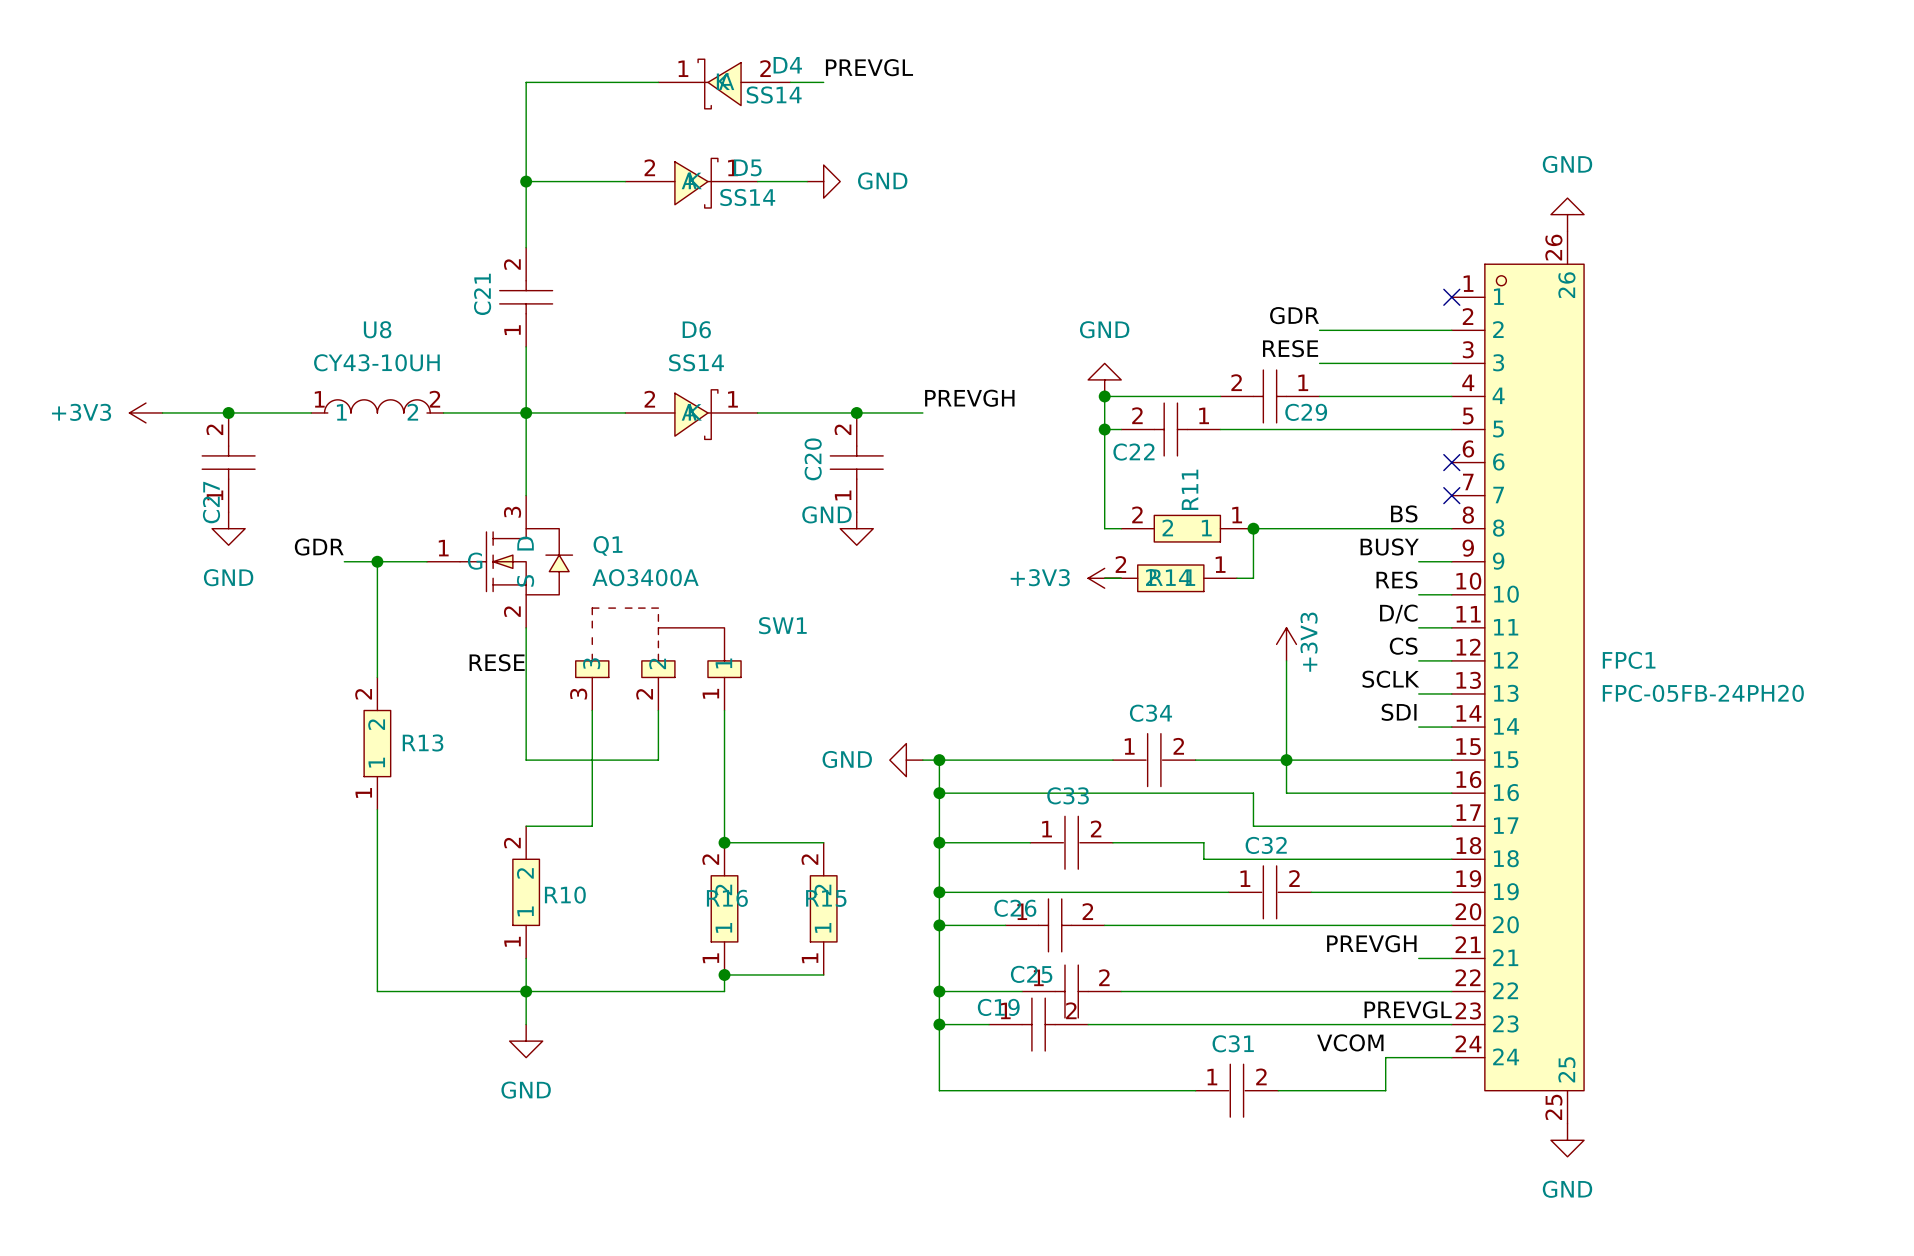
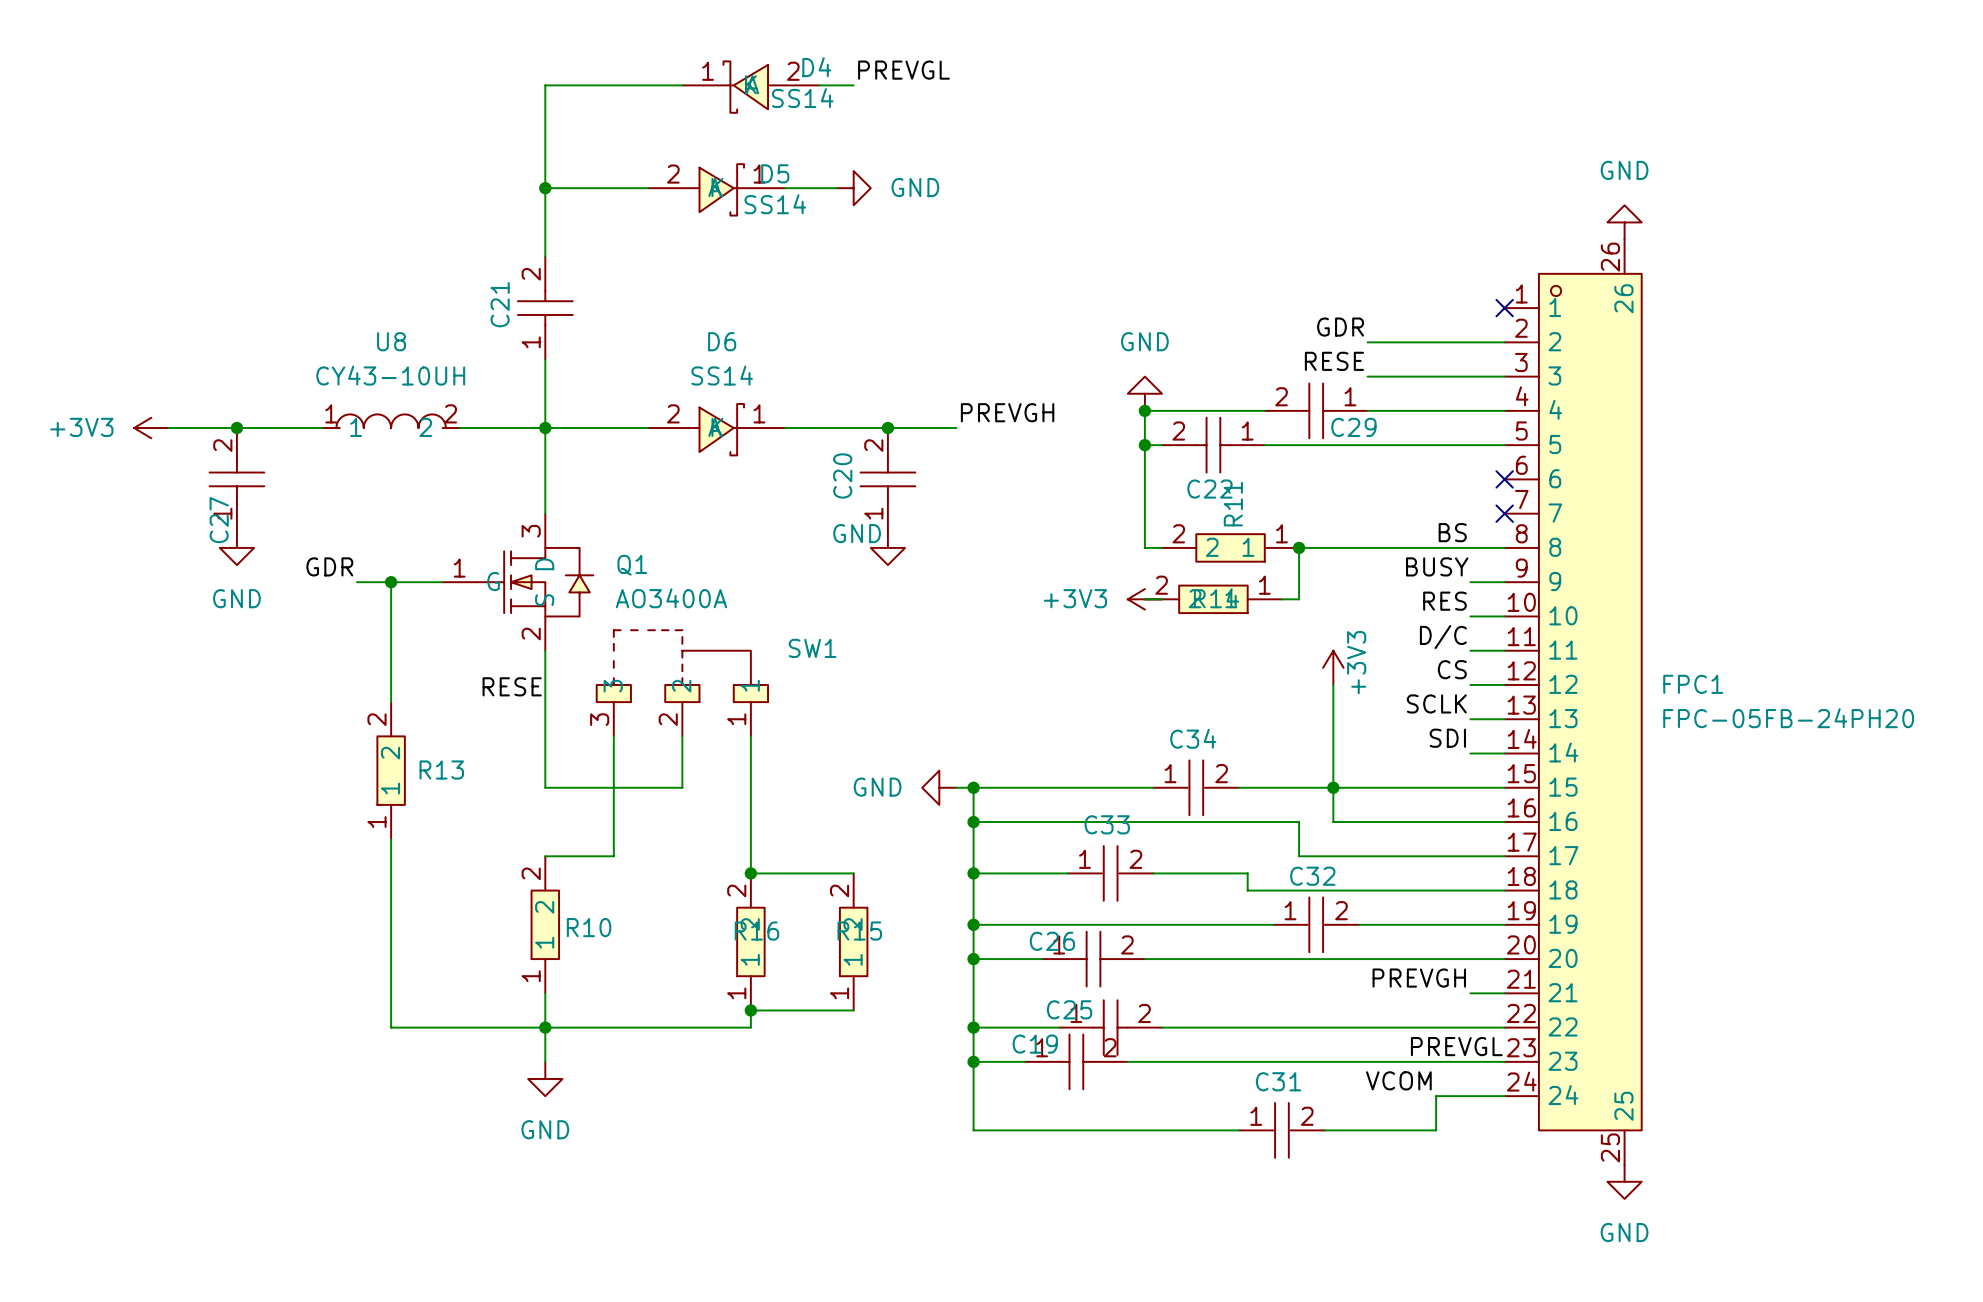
C22 name position: C22 (1133, 452) -> C22 (1210, 489)

